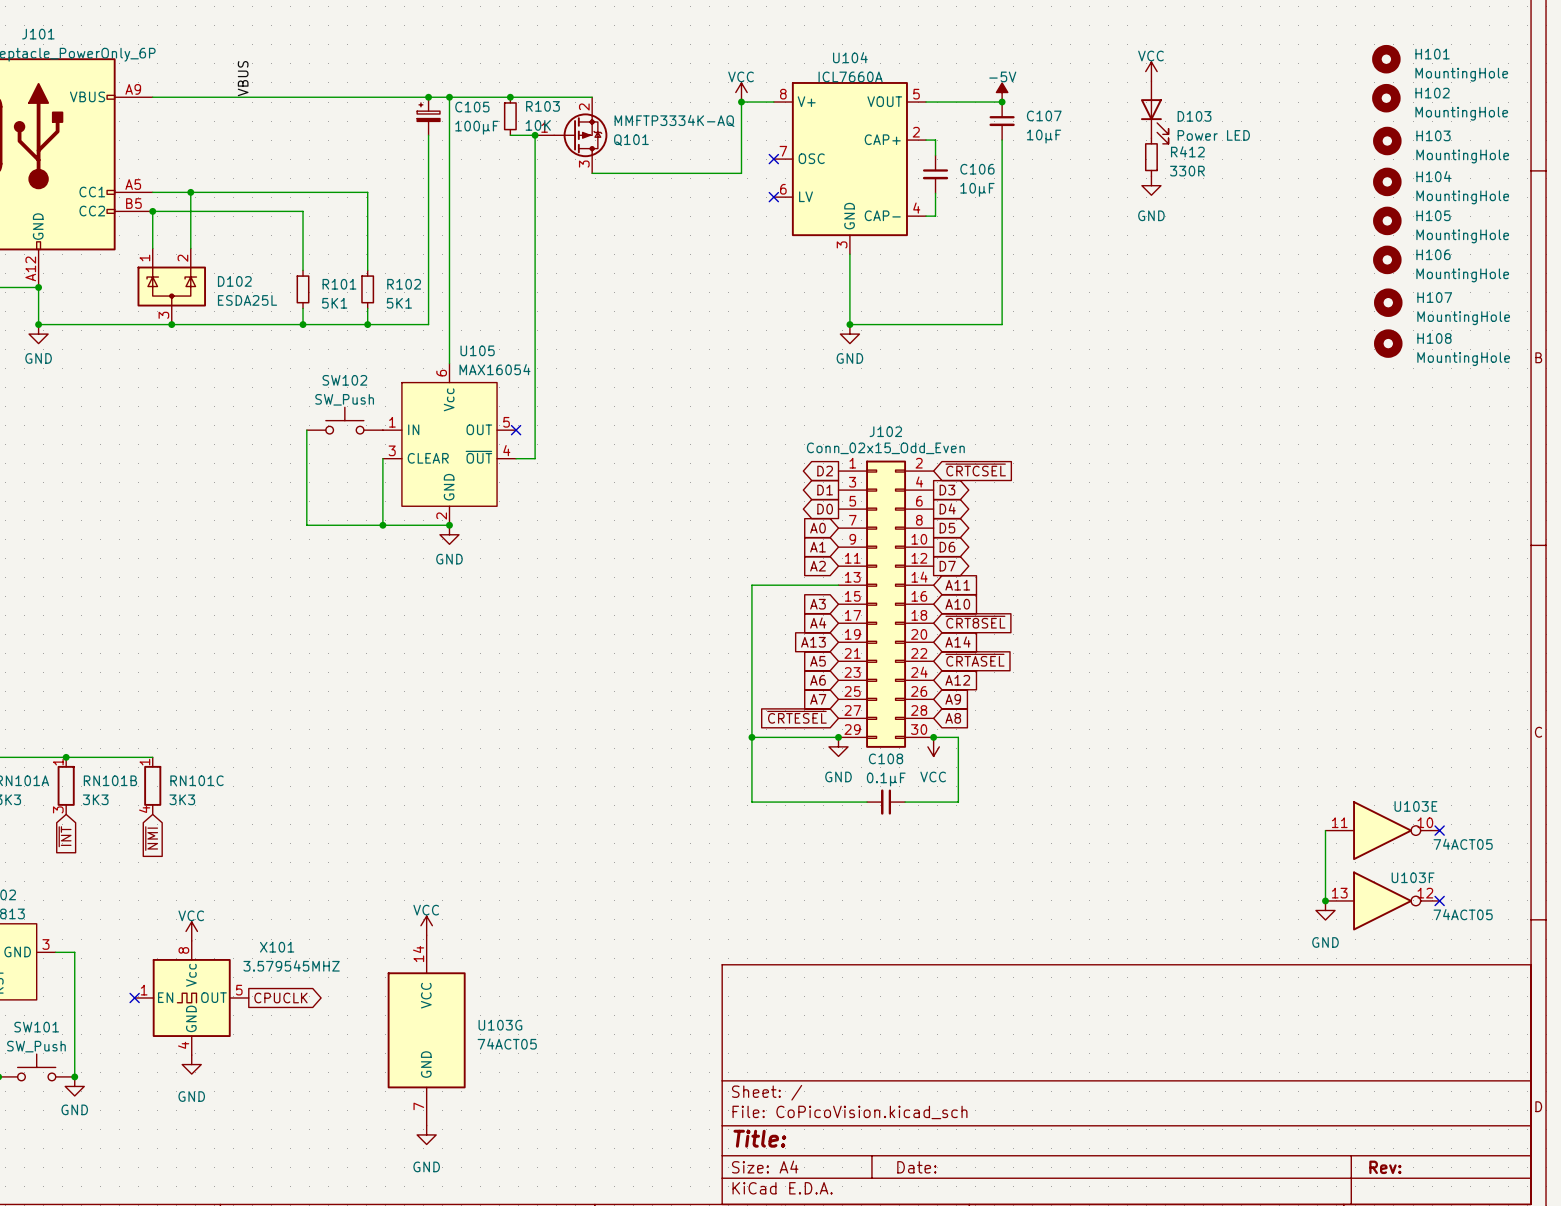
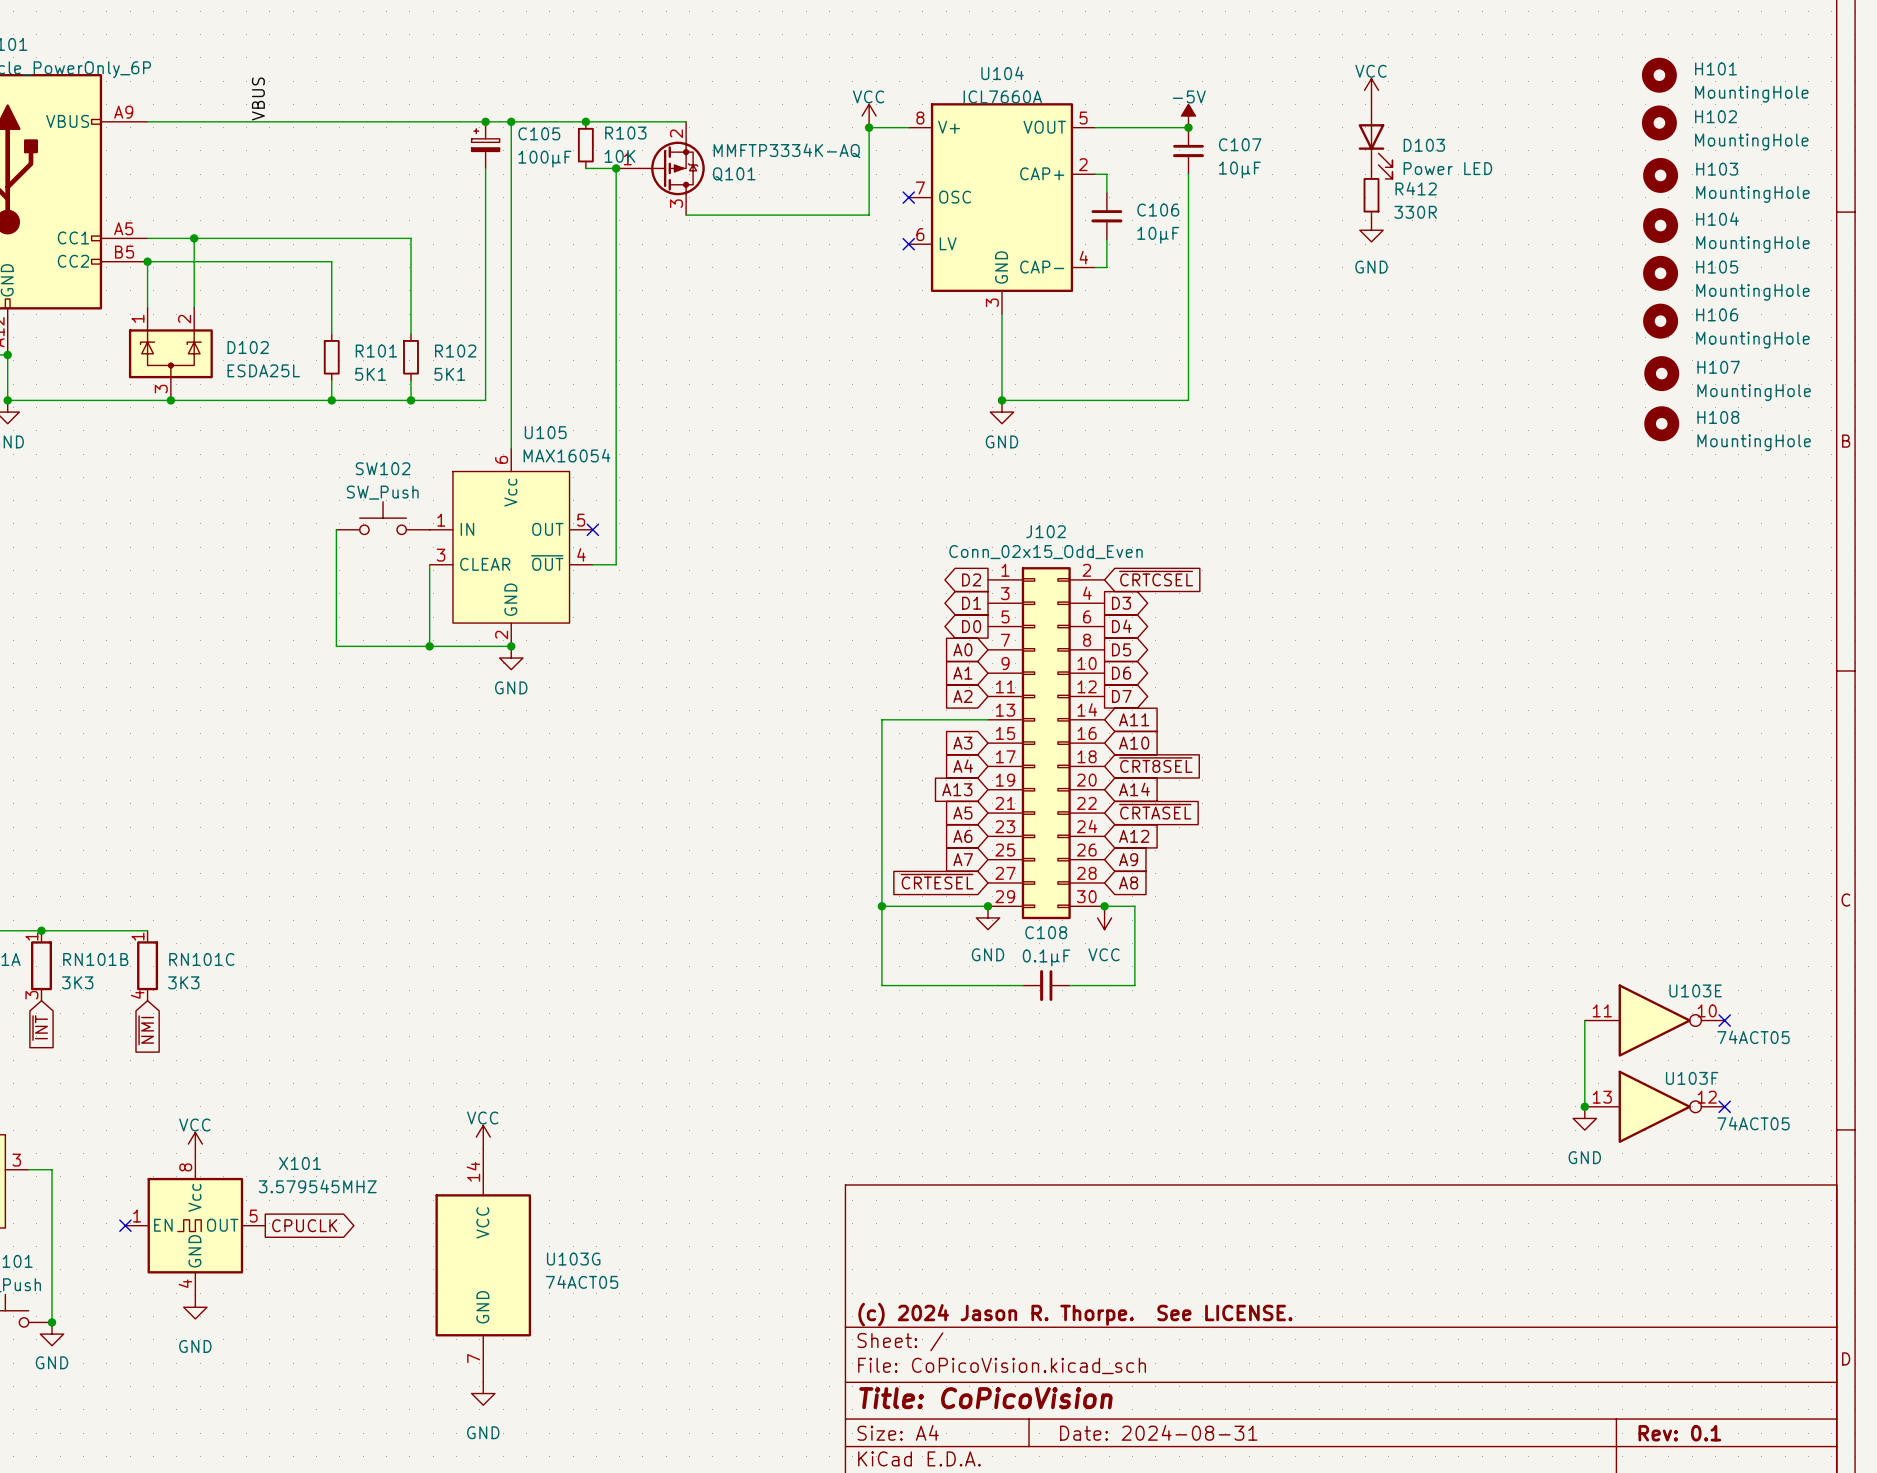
title block: none -> (c) 2024 Jason R. Thorpe. See LICENSE. (1075, 1314)
title block: Title: (759, 1138) -> Title: CoPicoVision (985, 1398)
title block: Date: (916, 1167) -> Date: 2024-08-31 (1158, 1432)
title block: Rev: (1385, 1167) -> Rev: 0.1 (1679, 1433)

